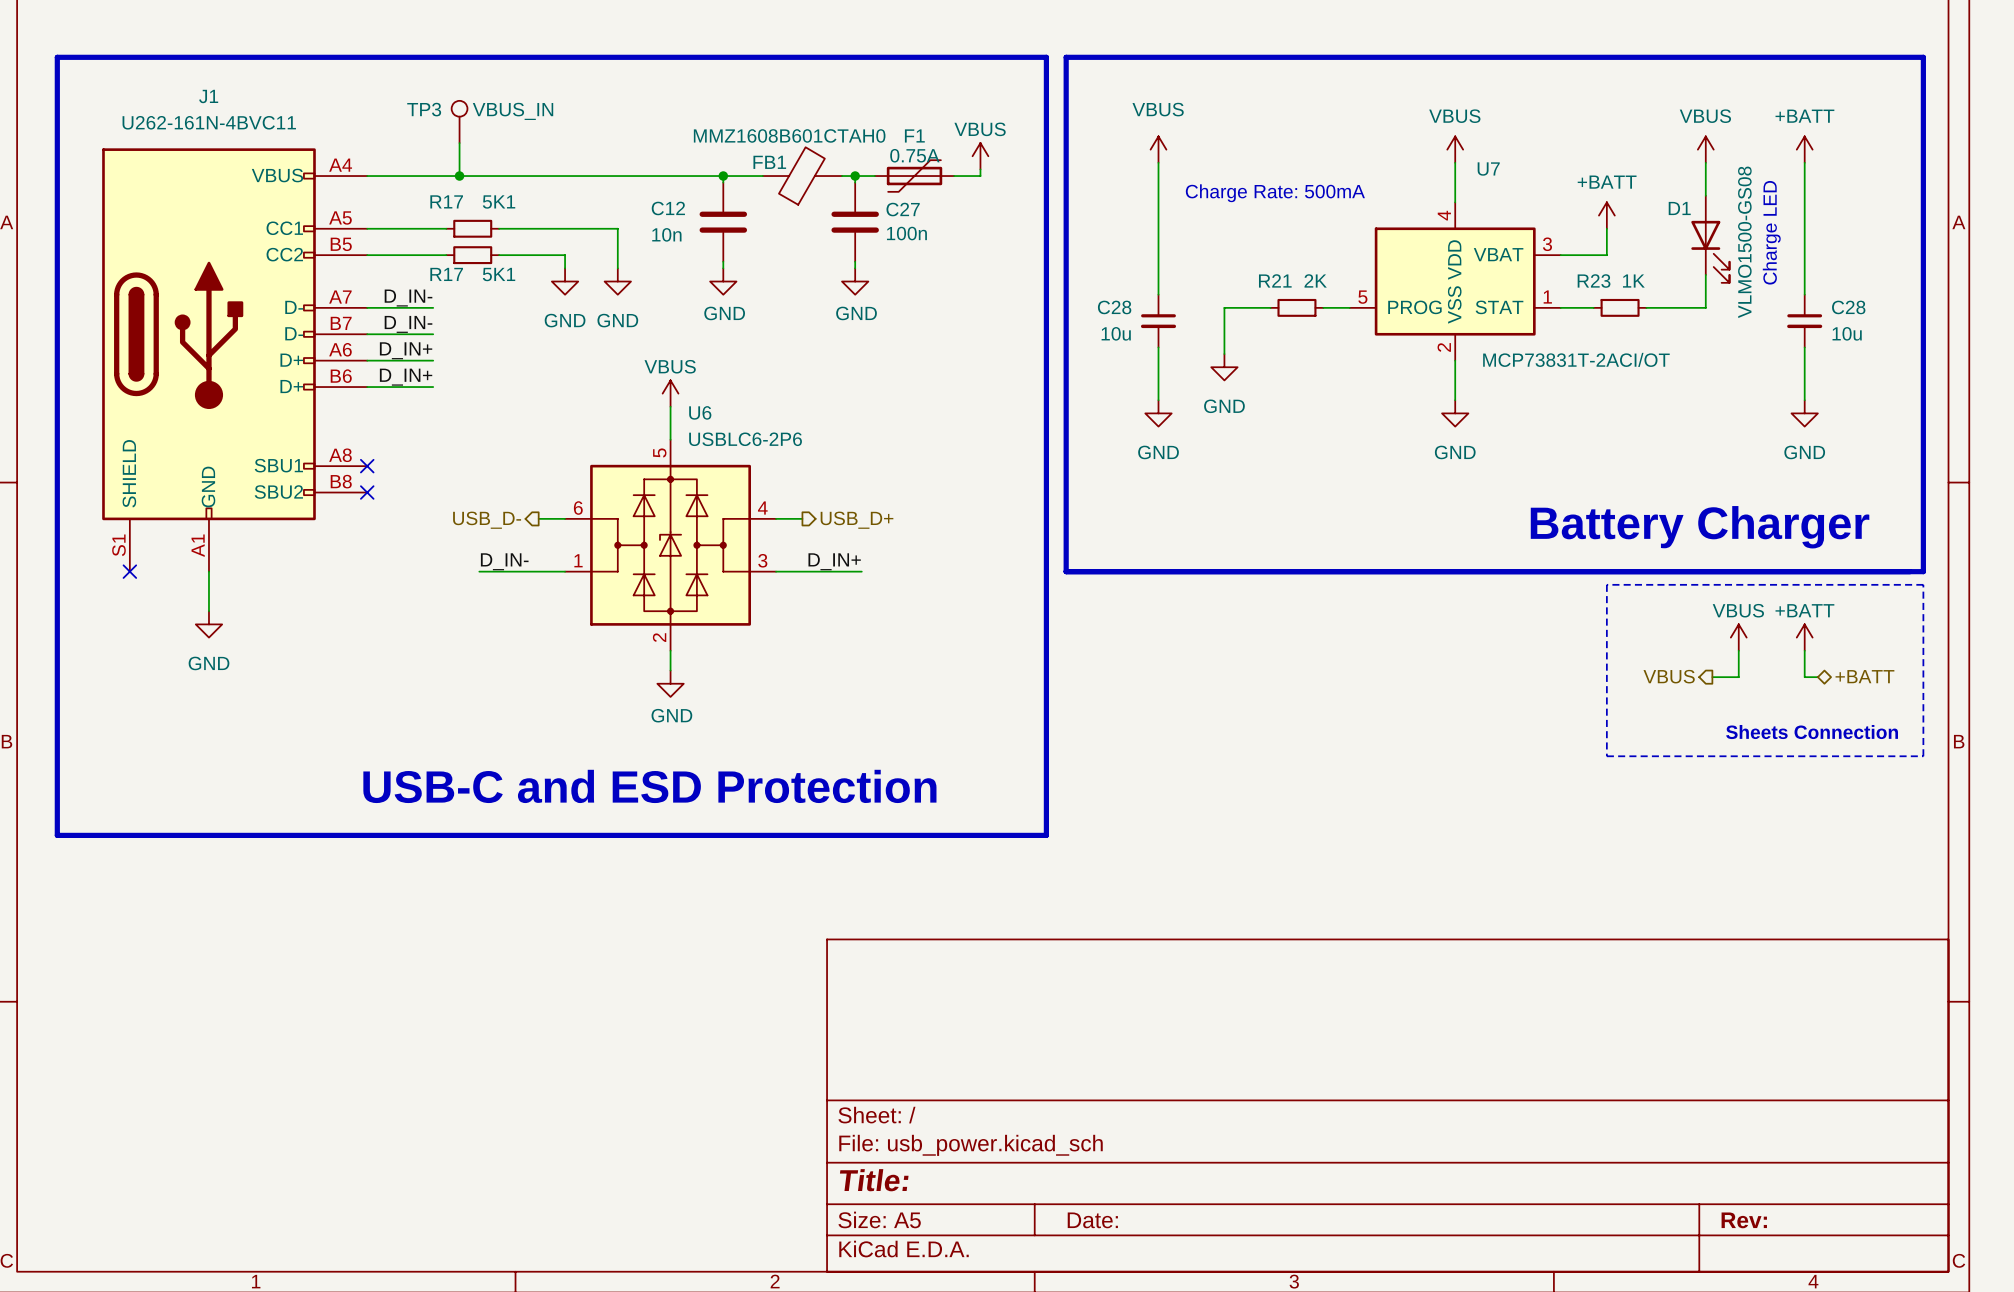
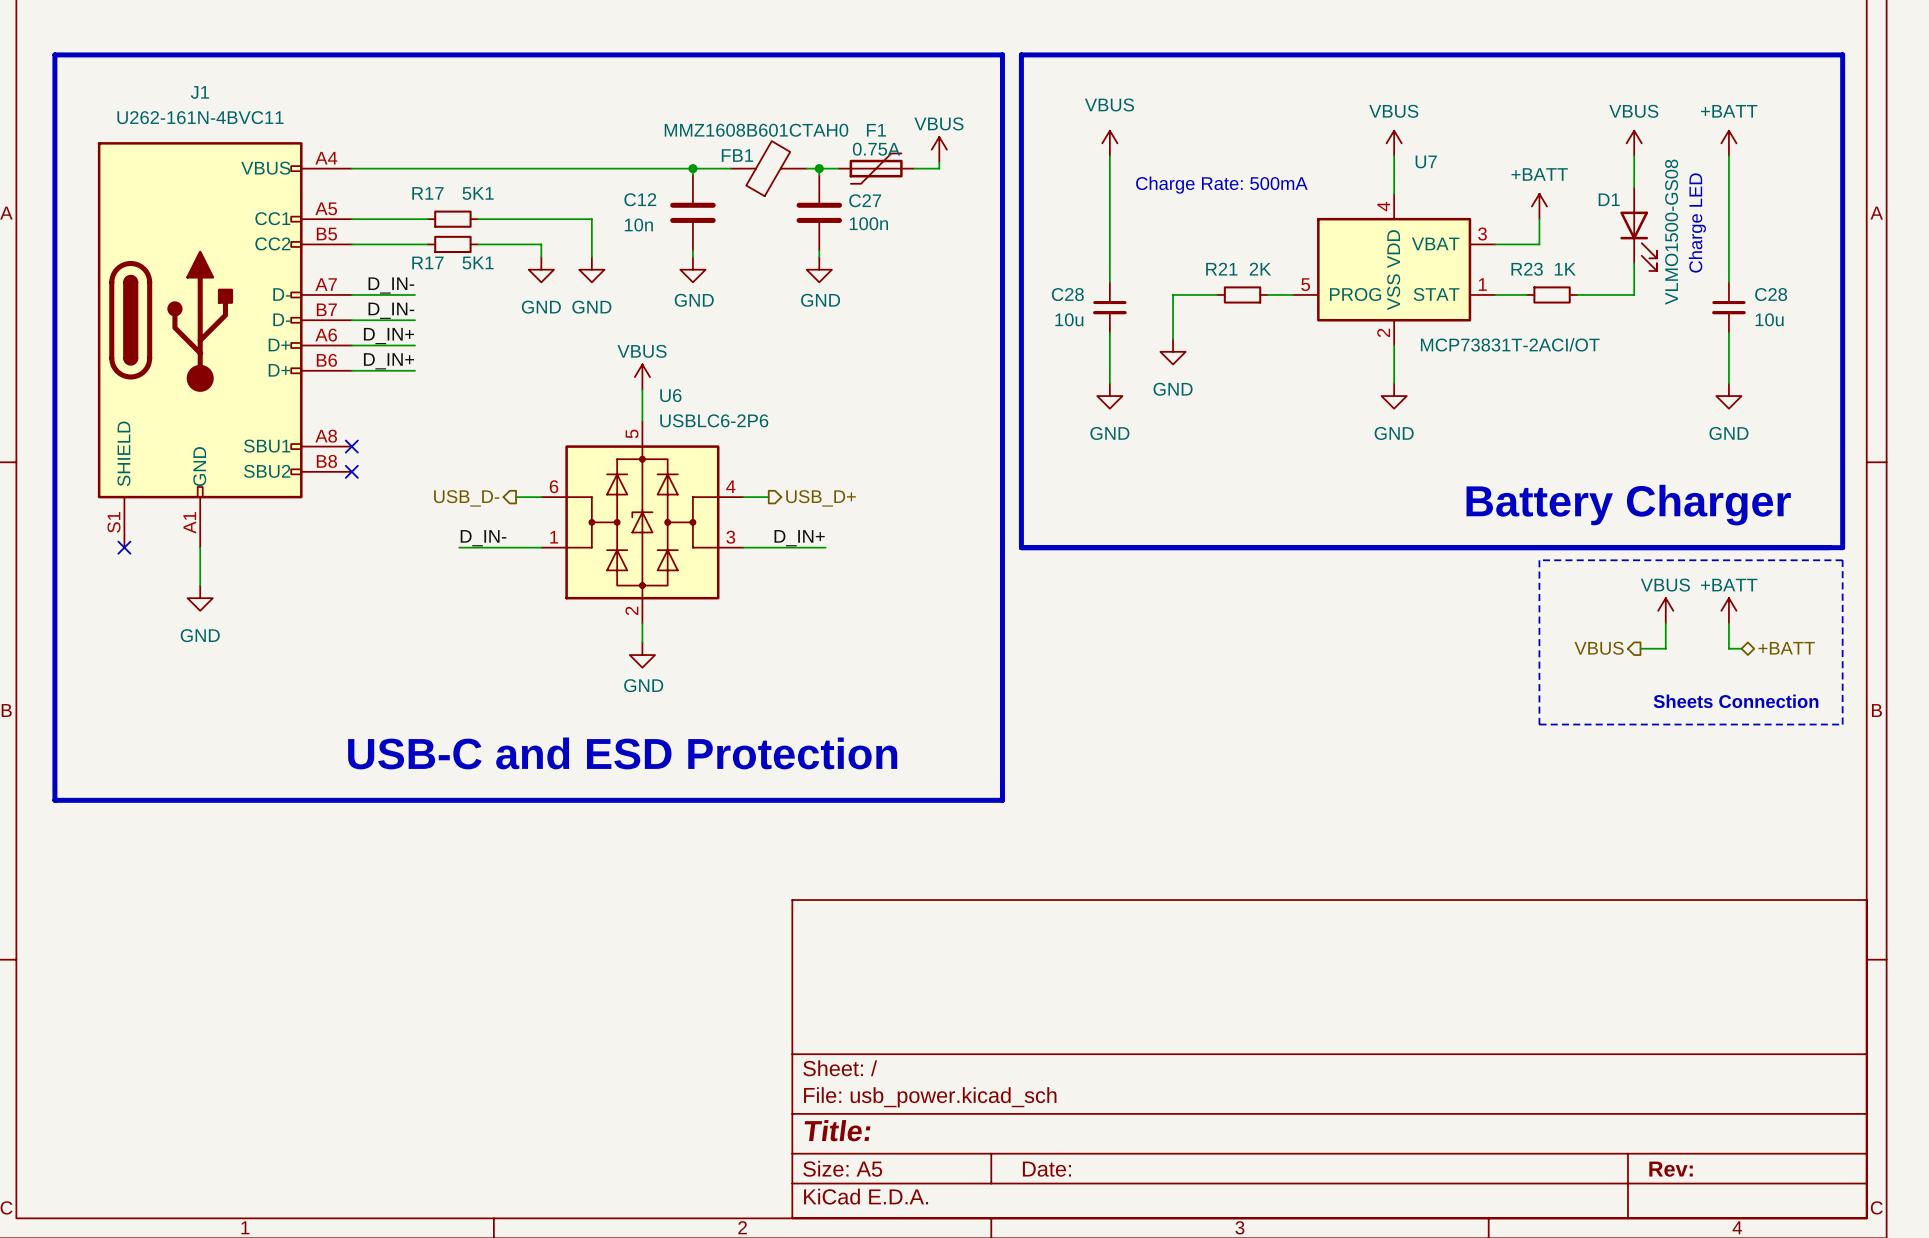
TP3: VBUS_IN (459, 121) -> none
wire: (459, 143) (459, 176) -> none
junction: (459, 176) -> none

